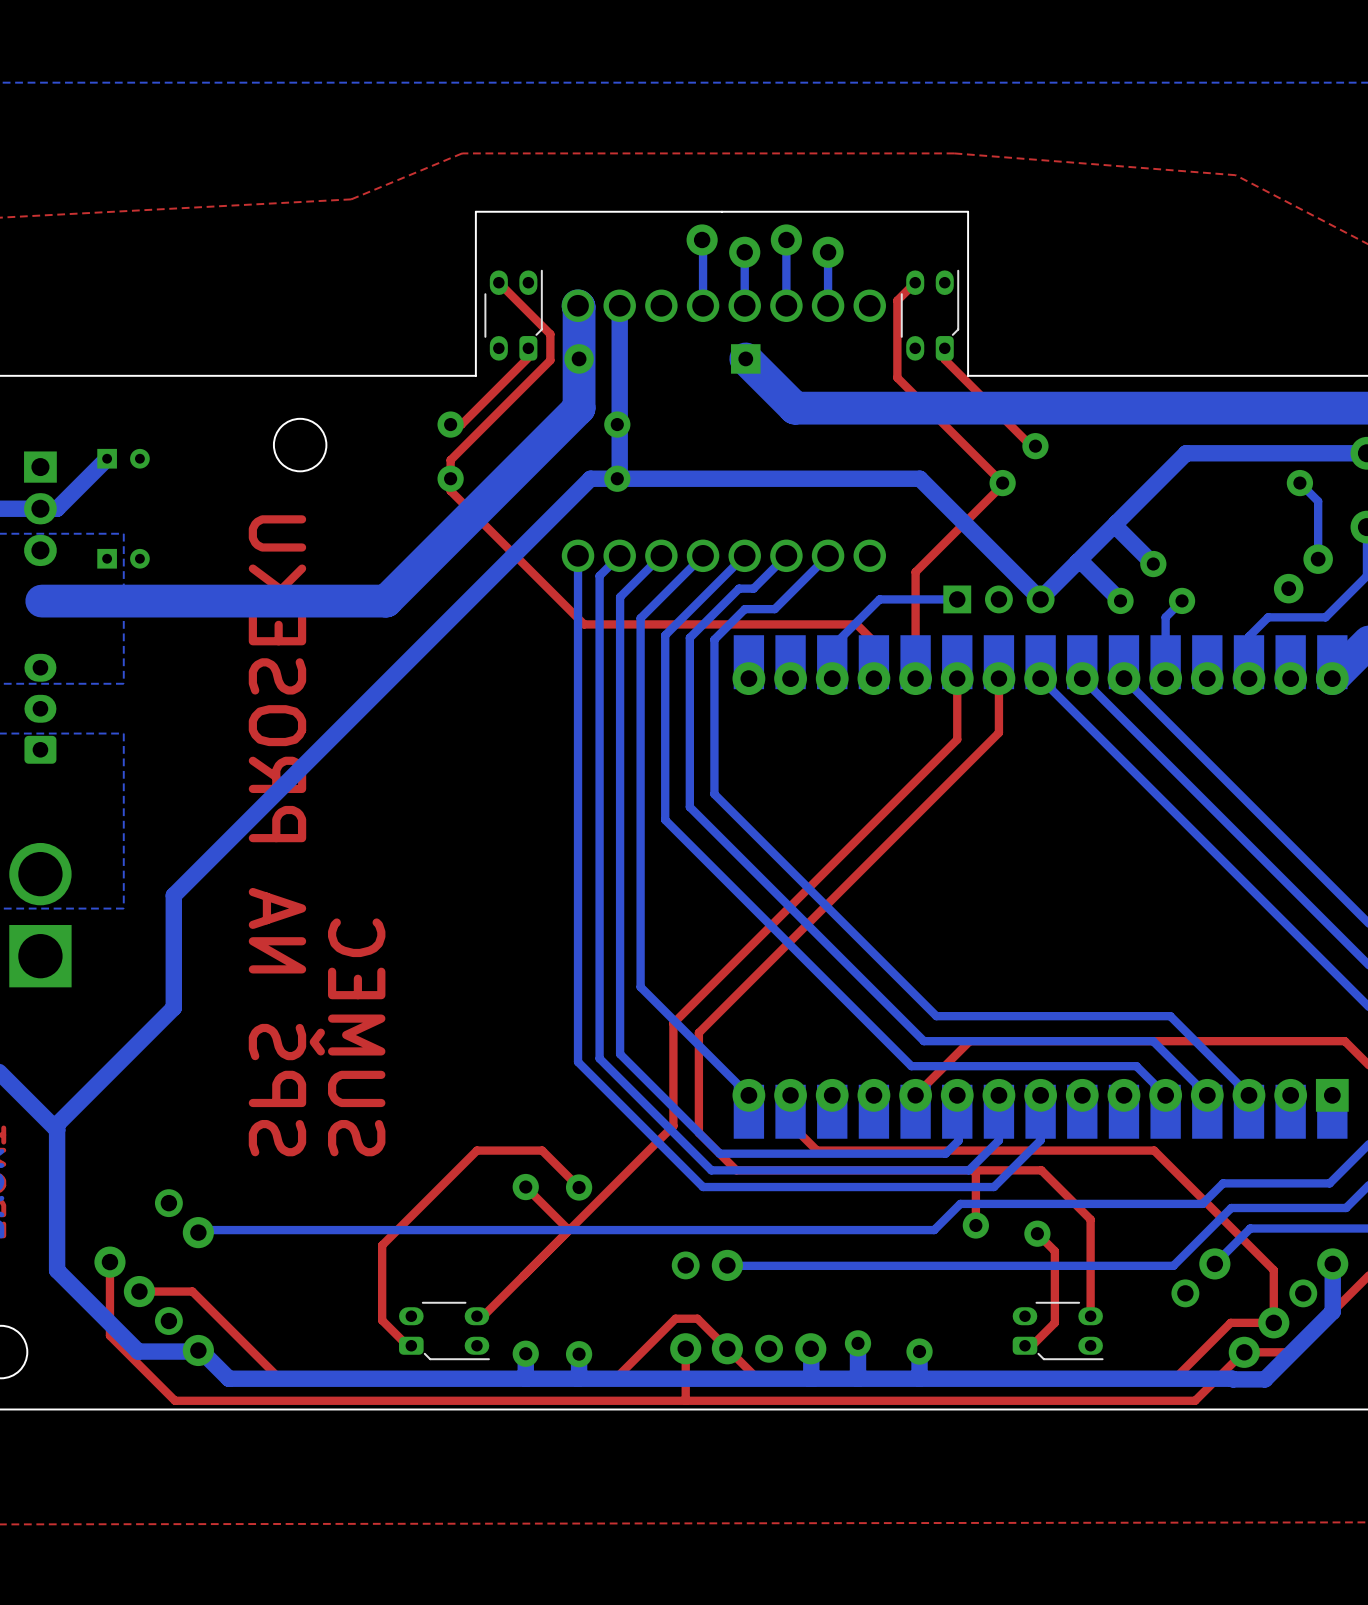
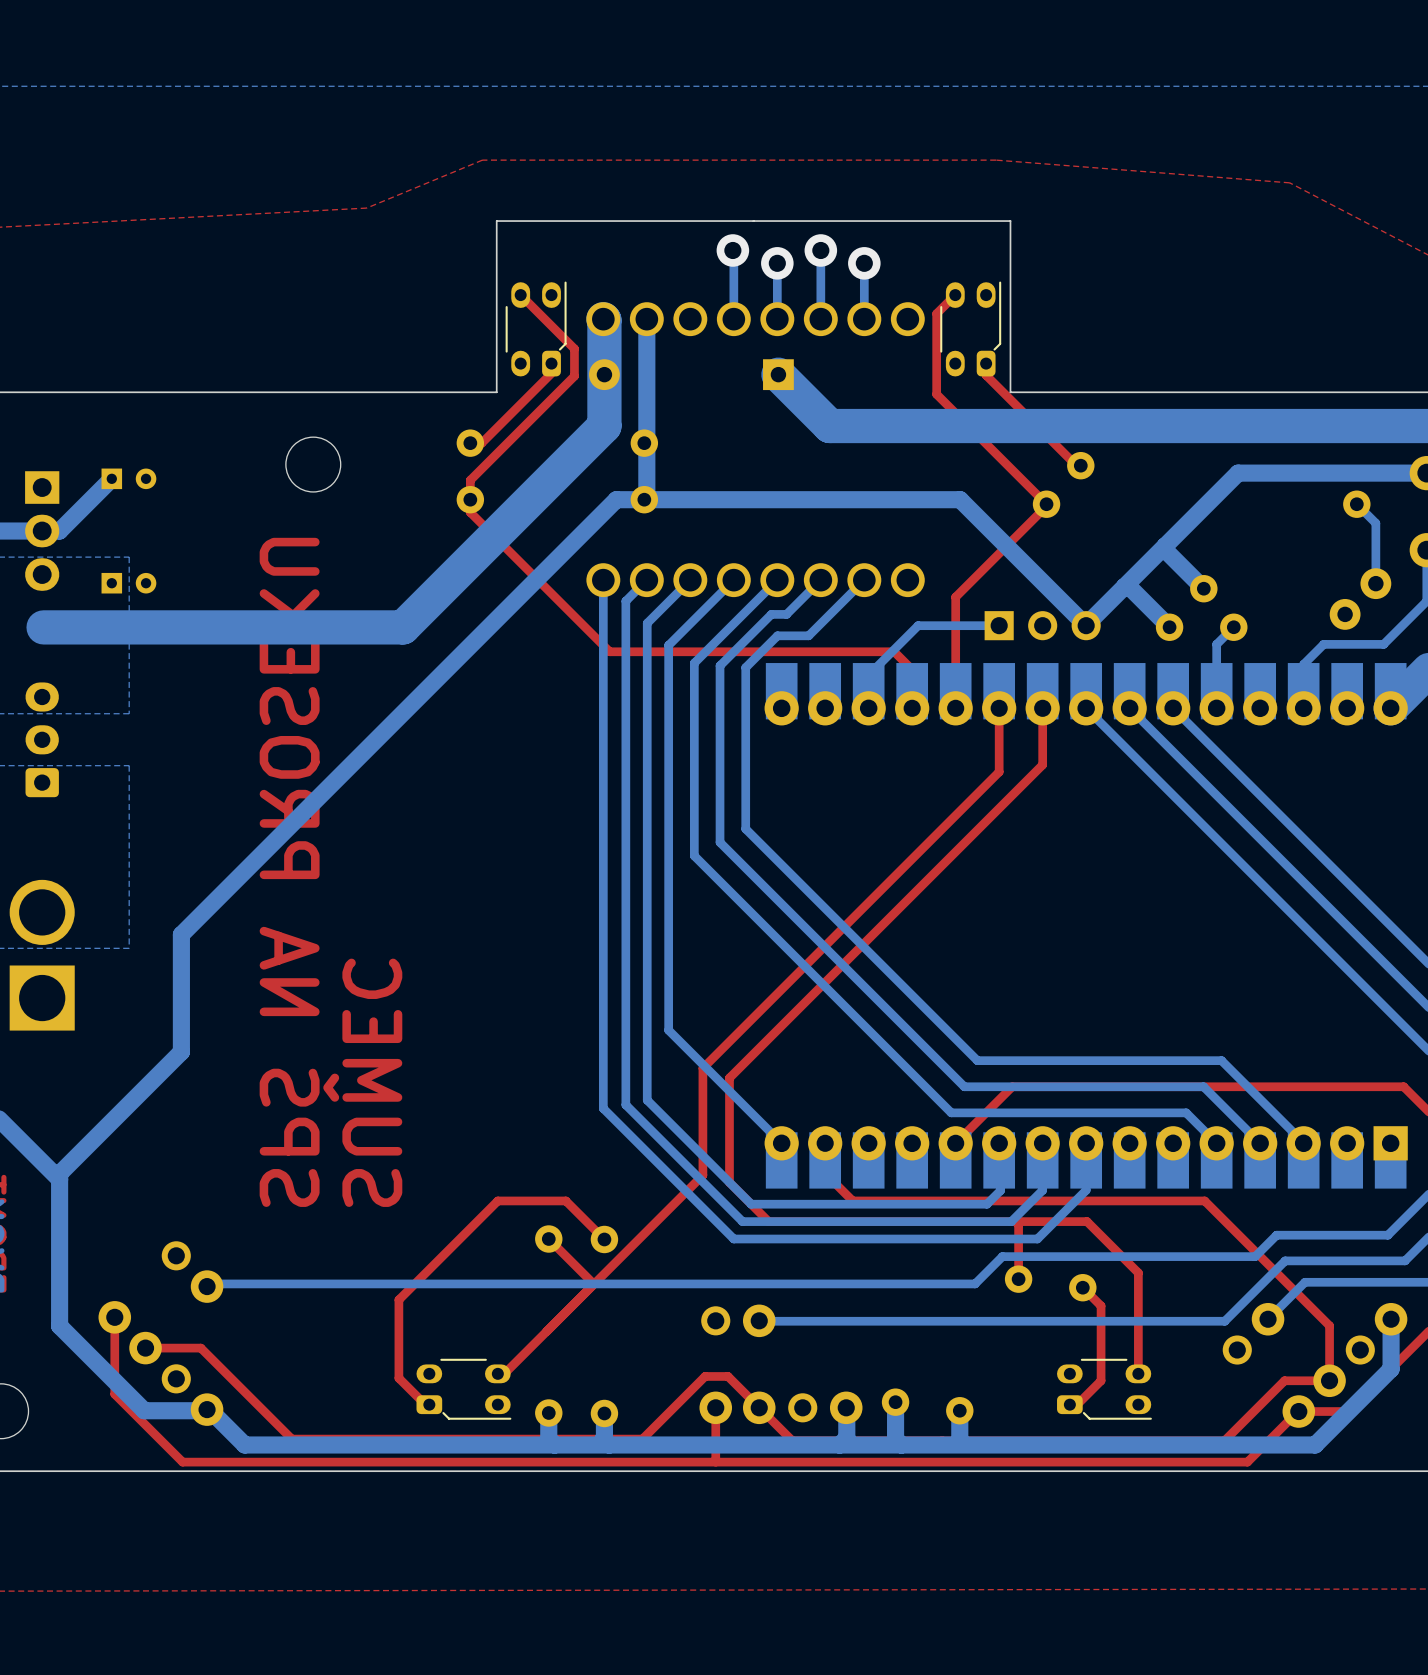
bottom track: (811, 1377) (1264, 1379) -> none
bottom track: (810, 1378) (228, 1378) -> (1320, 1439) (1315, 1444) (244, 1444) (238, 1439)

